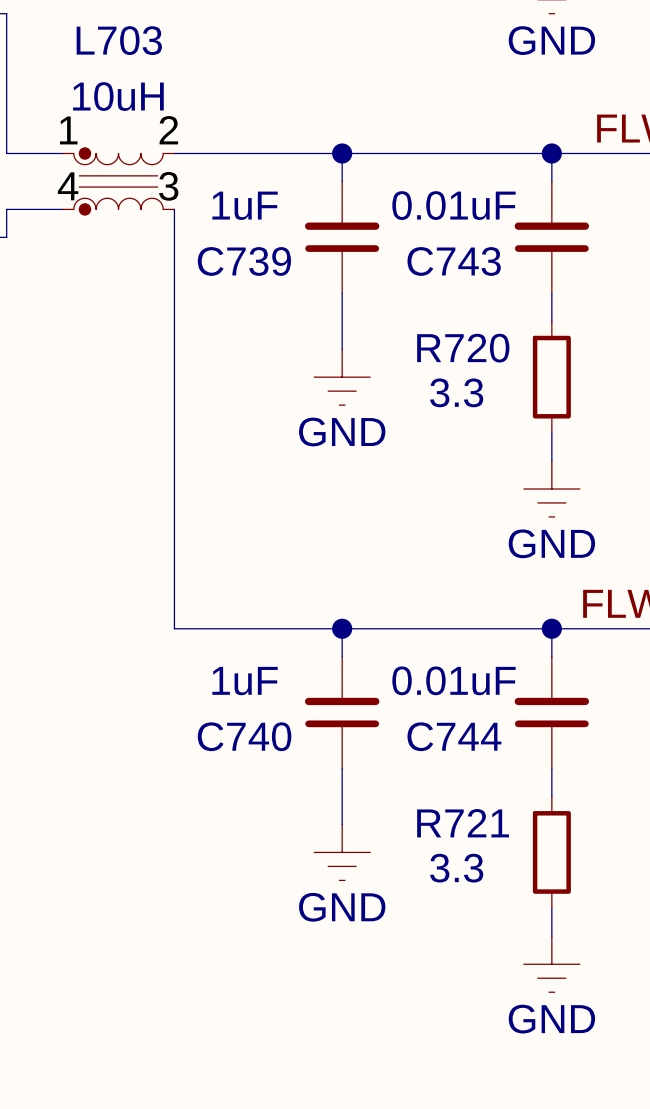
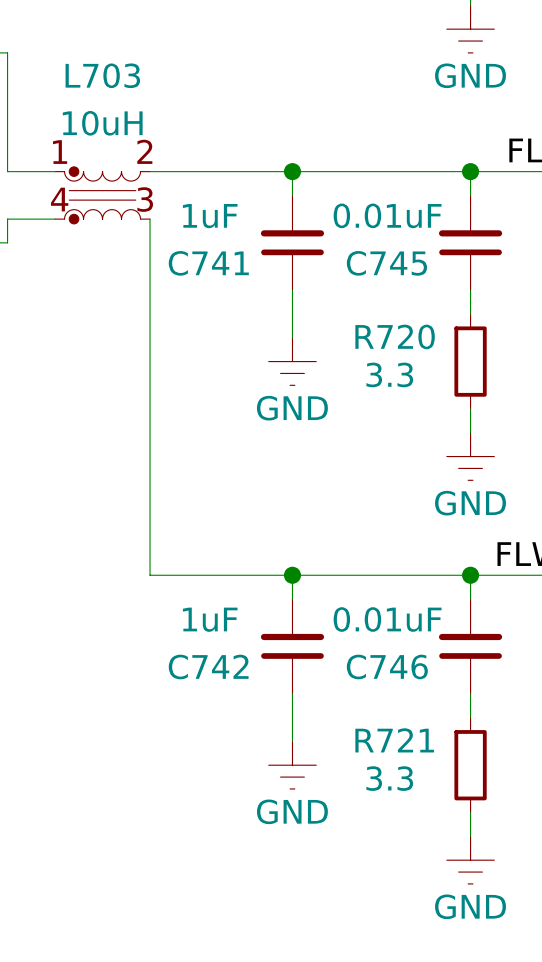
C739 name: C739 (244, 261) -> C741 (208, 263)
C743 name: C743 (454, 261) -> C745 (386, 263)
C740 name: C740 (244, 736) -> C742 (208, 666)
C744 name: C744 (454, 736) -> C746 (387, 666)

